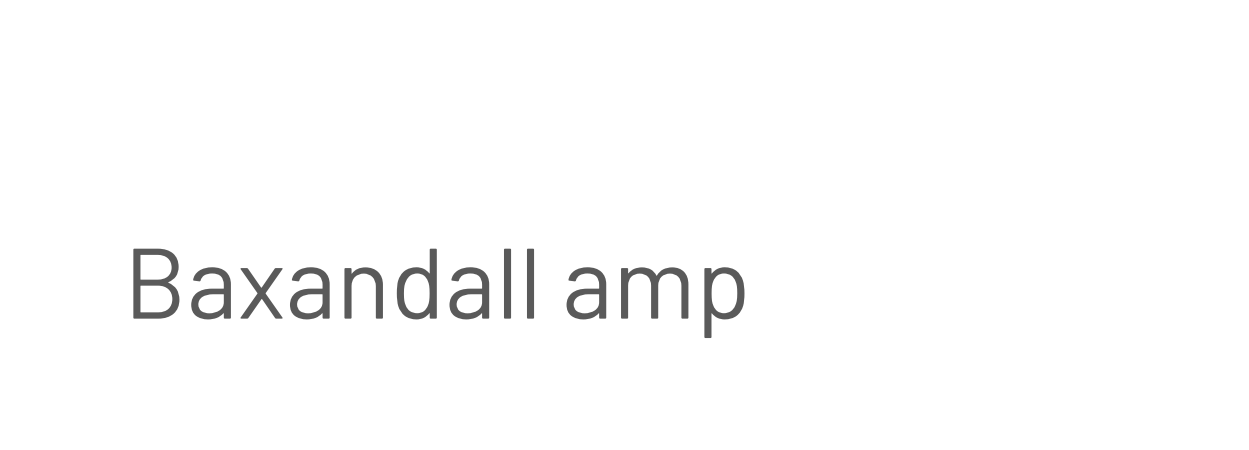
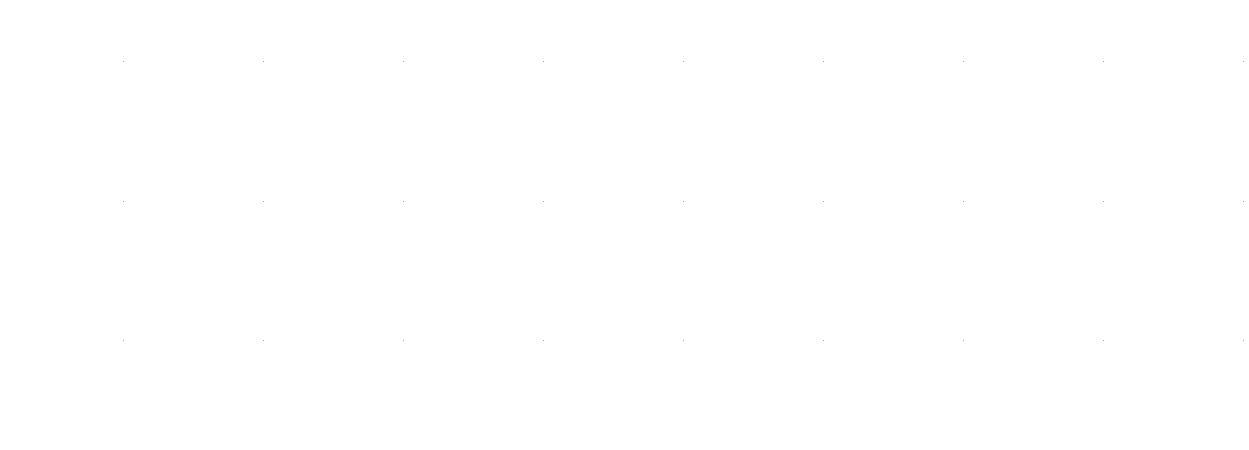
text: Baxandall amp (438, 293) -> none

